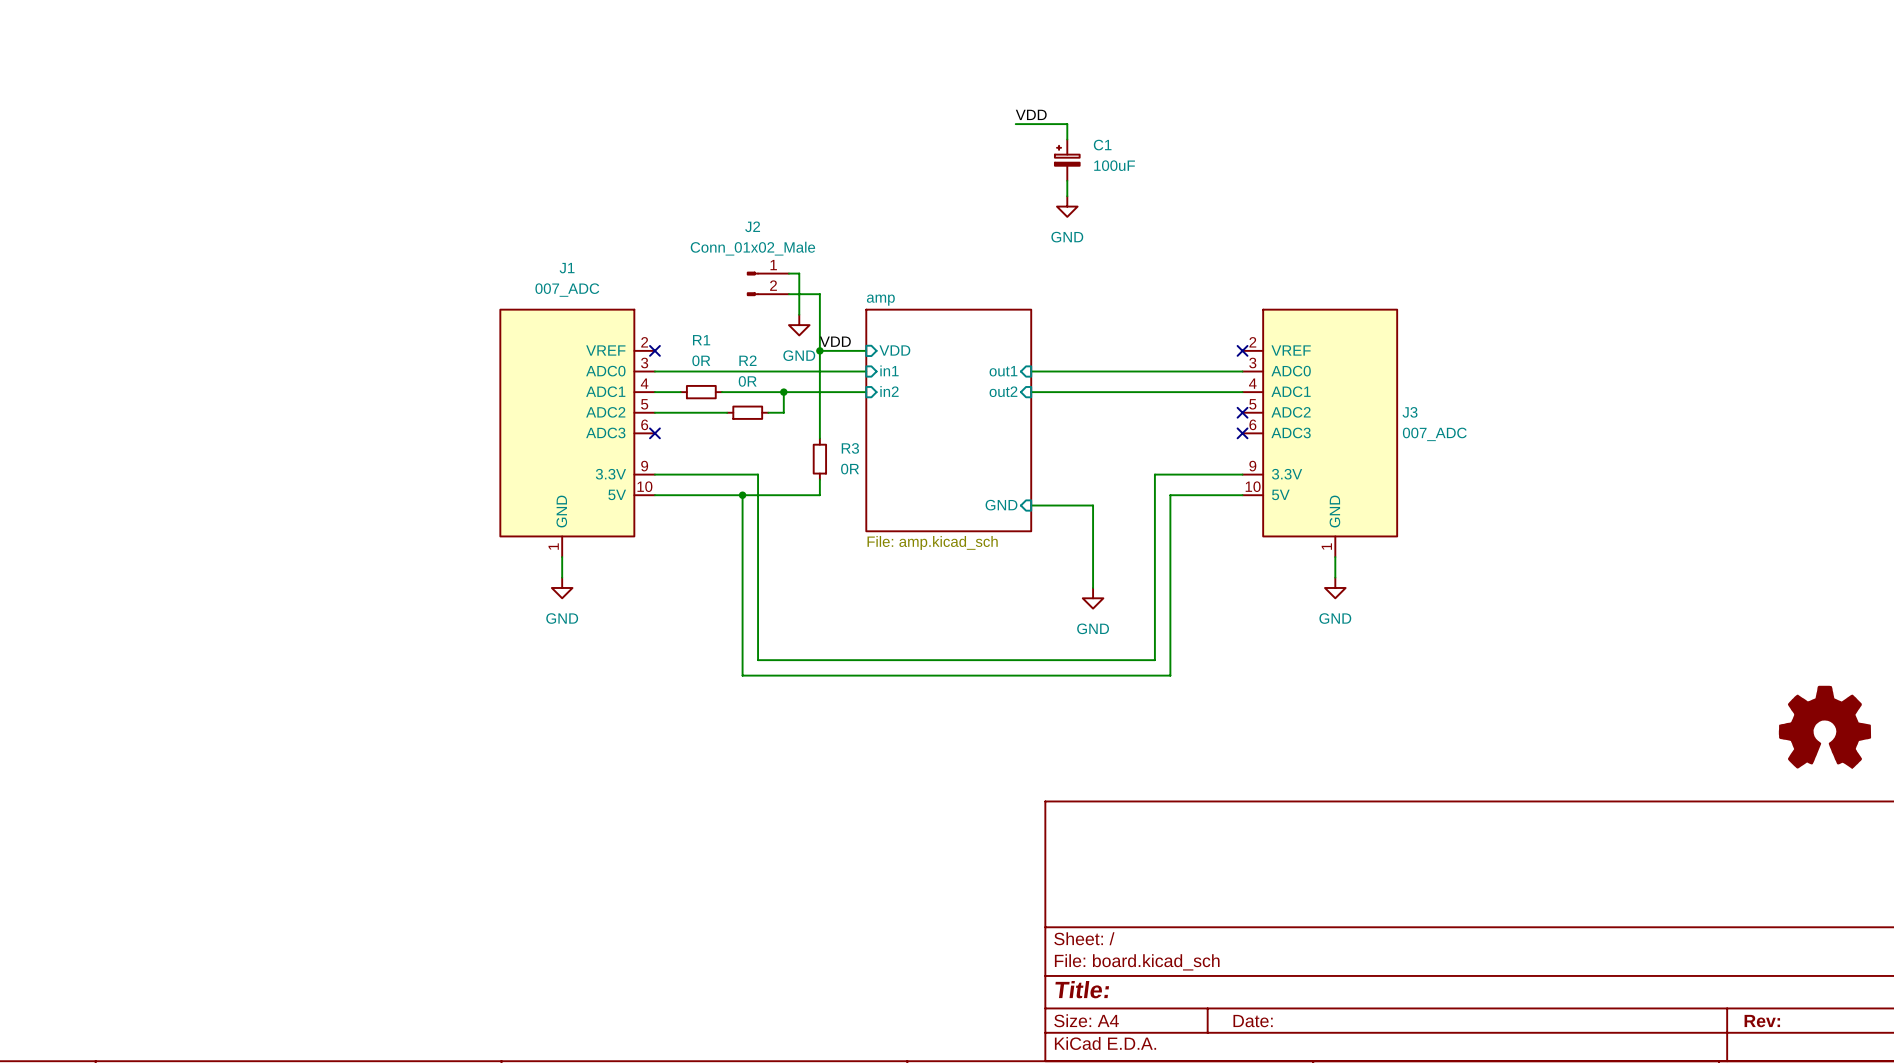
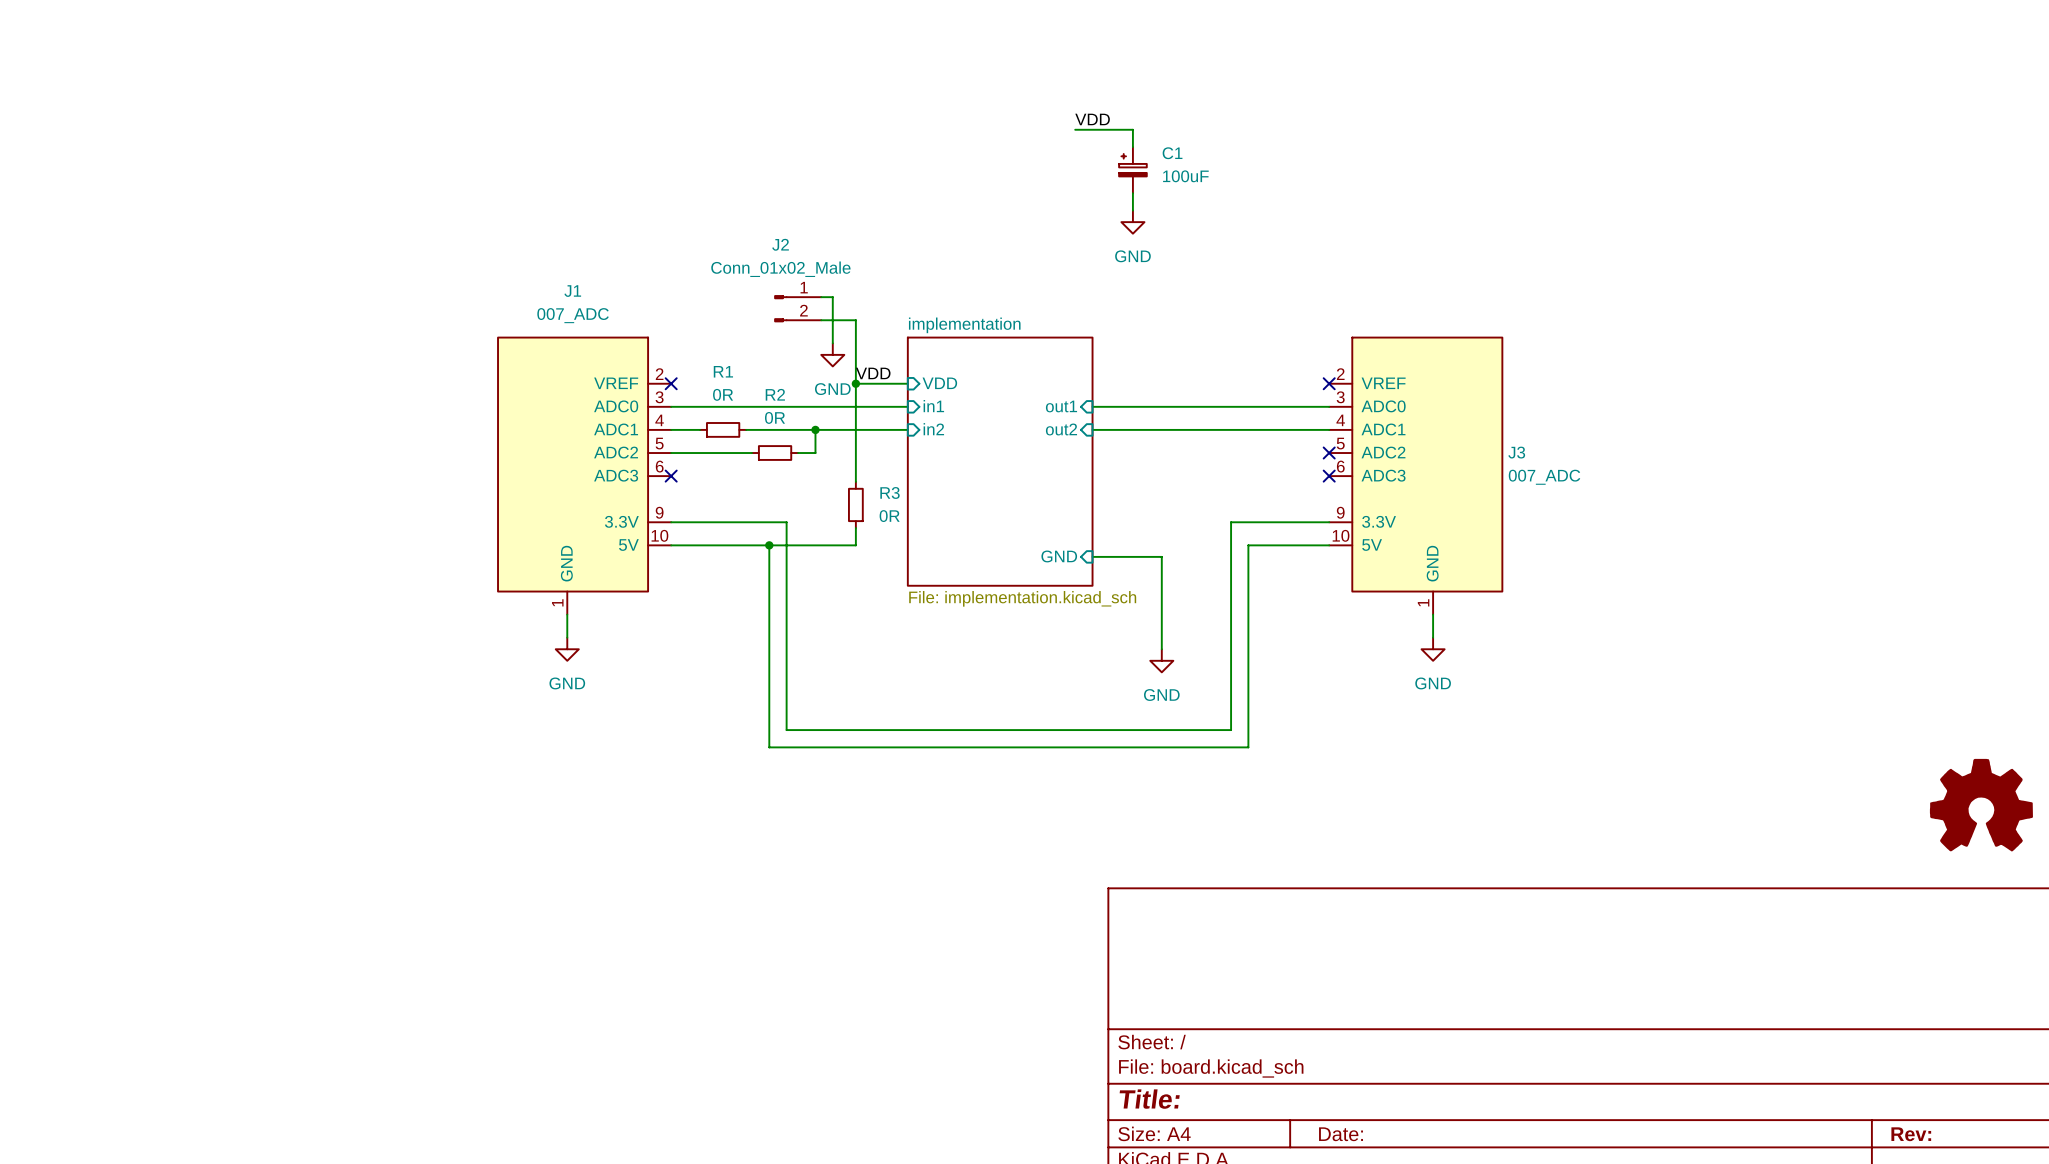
sheet amp name: amp (880, 300) -> implementation (964, 325)
sheet amp value: File: amp.kicad_sch (932, 542) -> File: implementation.kicad_sch (1022, 598)

